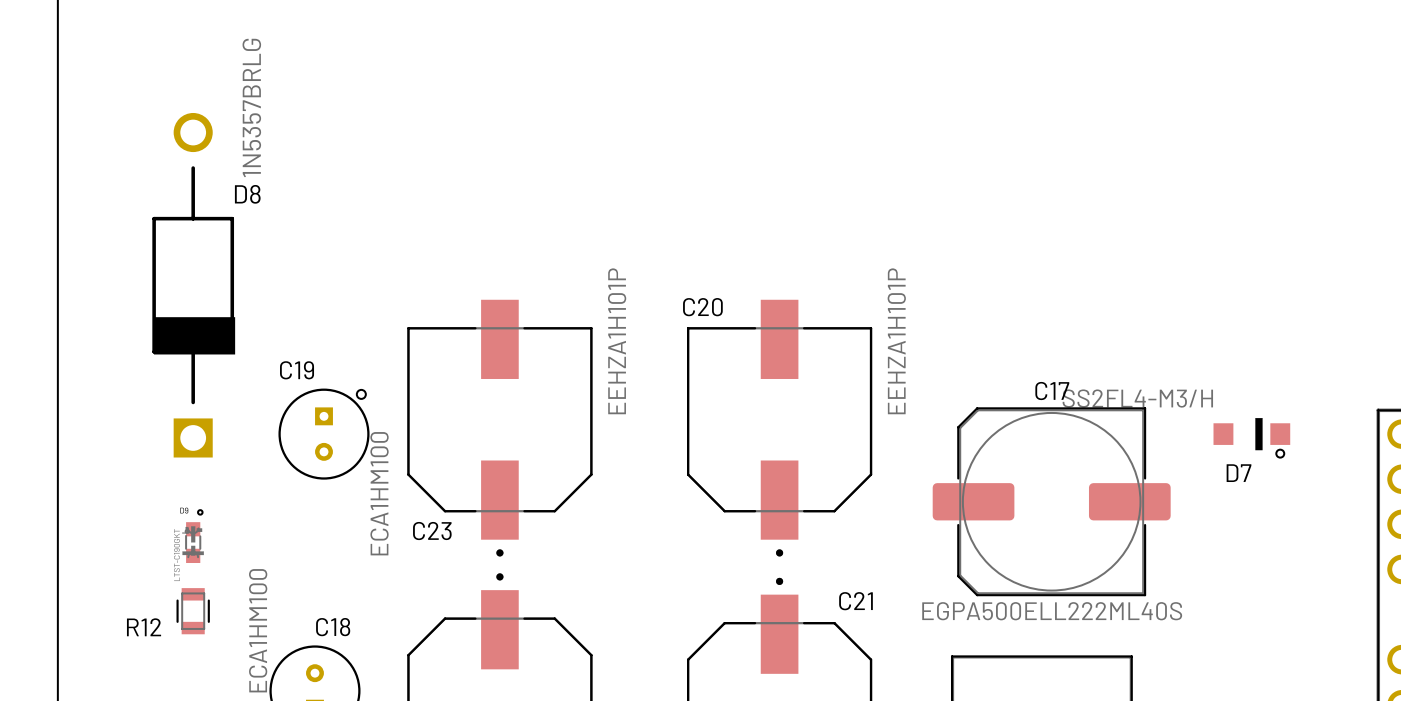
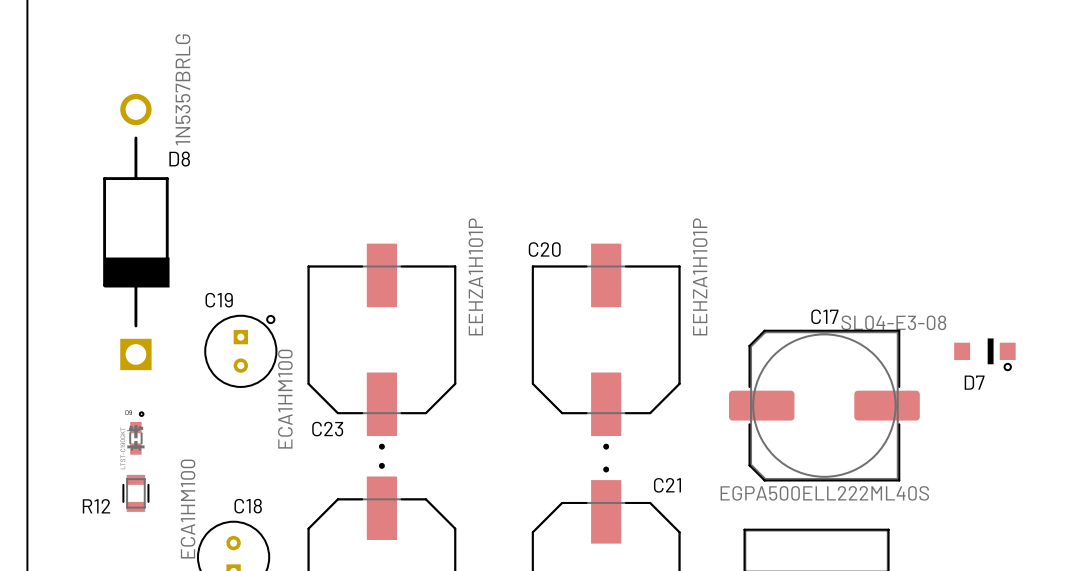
D7 value: SS2FL4-M3/H (1137, 398) -> SL04-E3-08 (893, 322)

